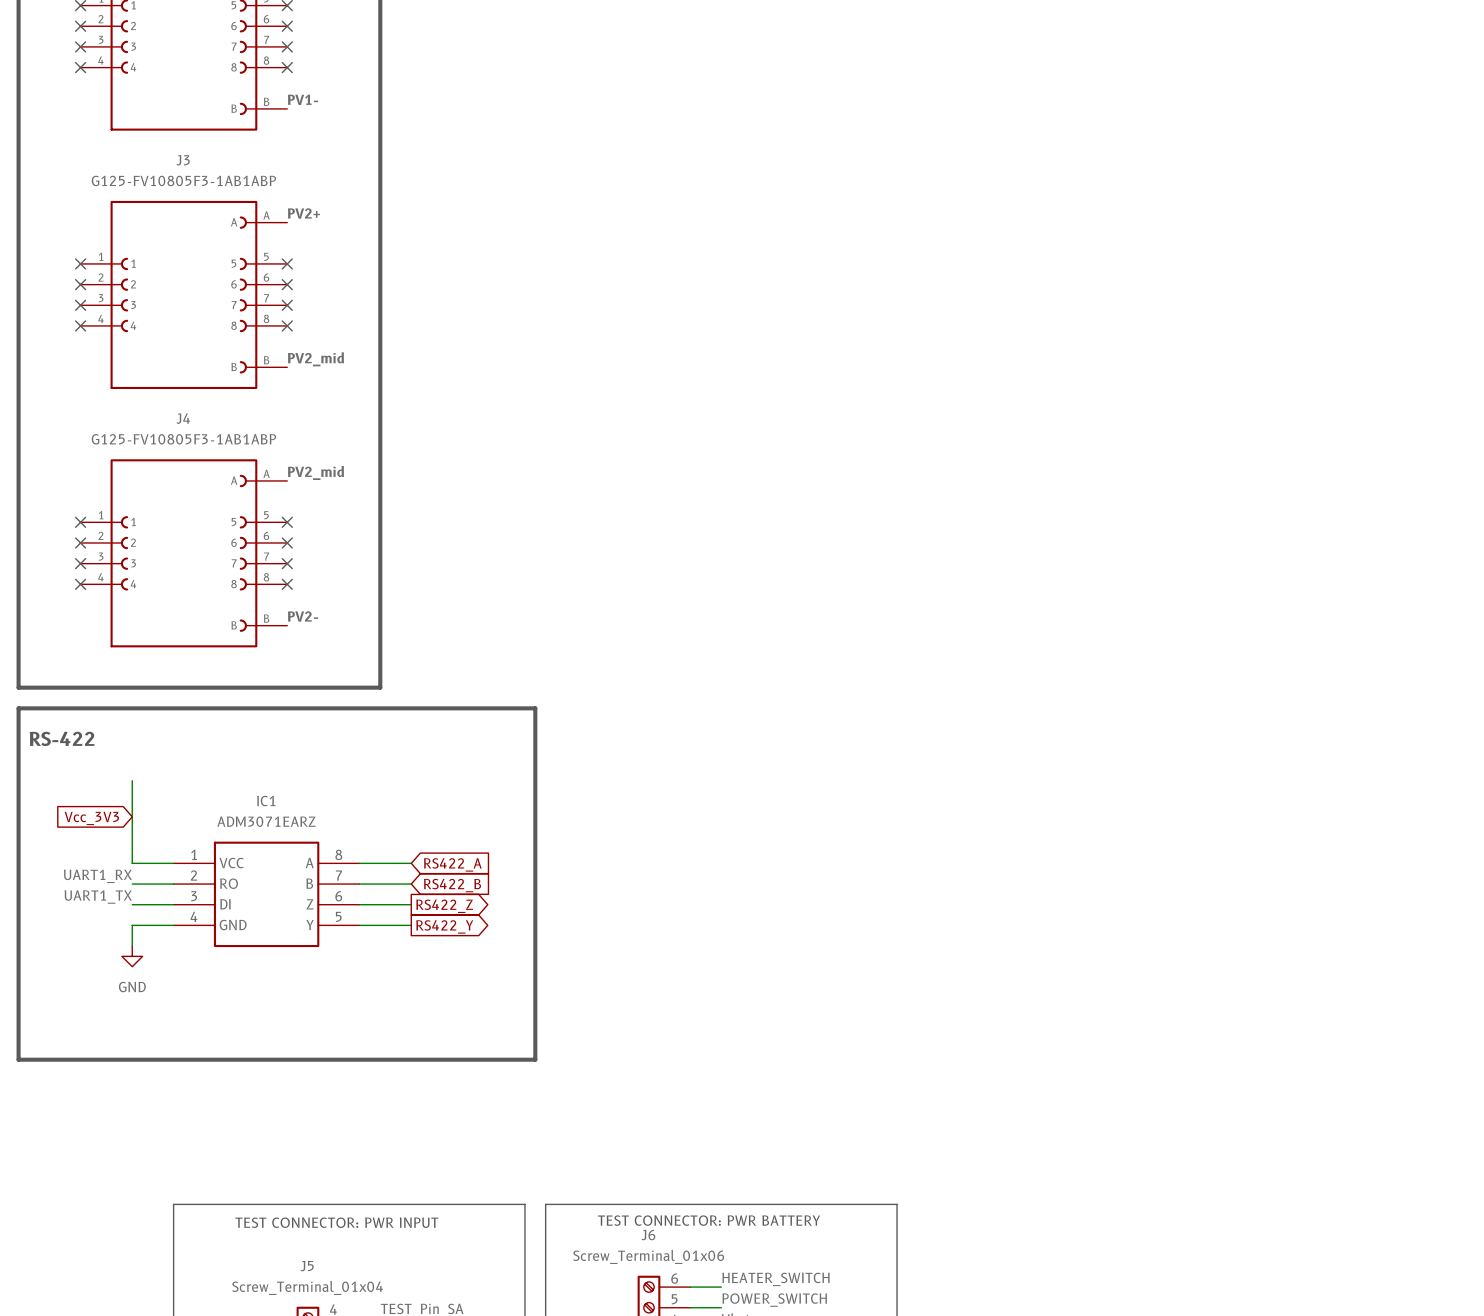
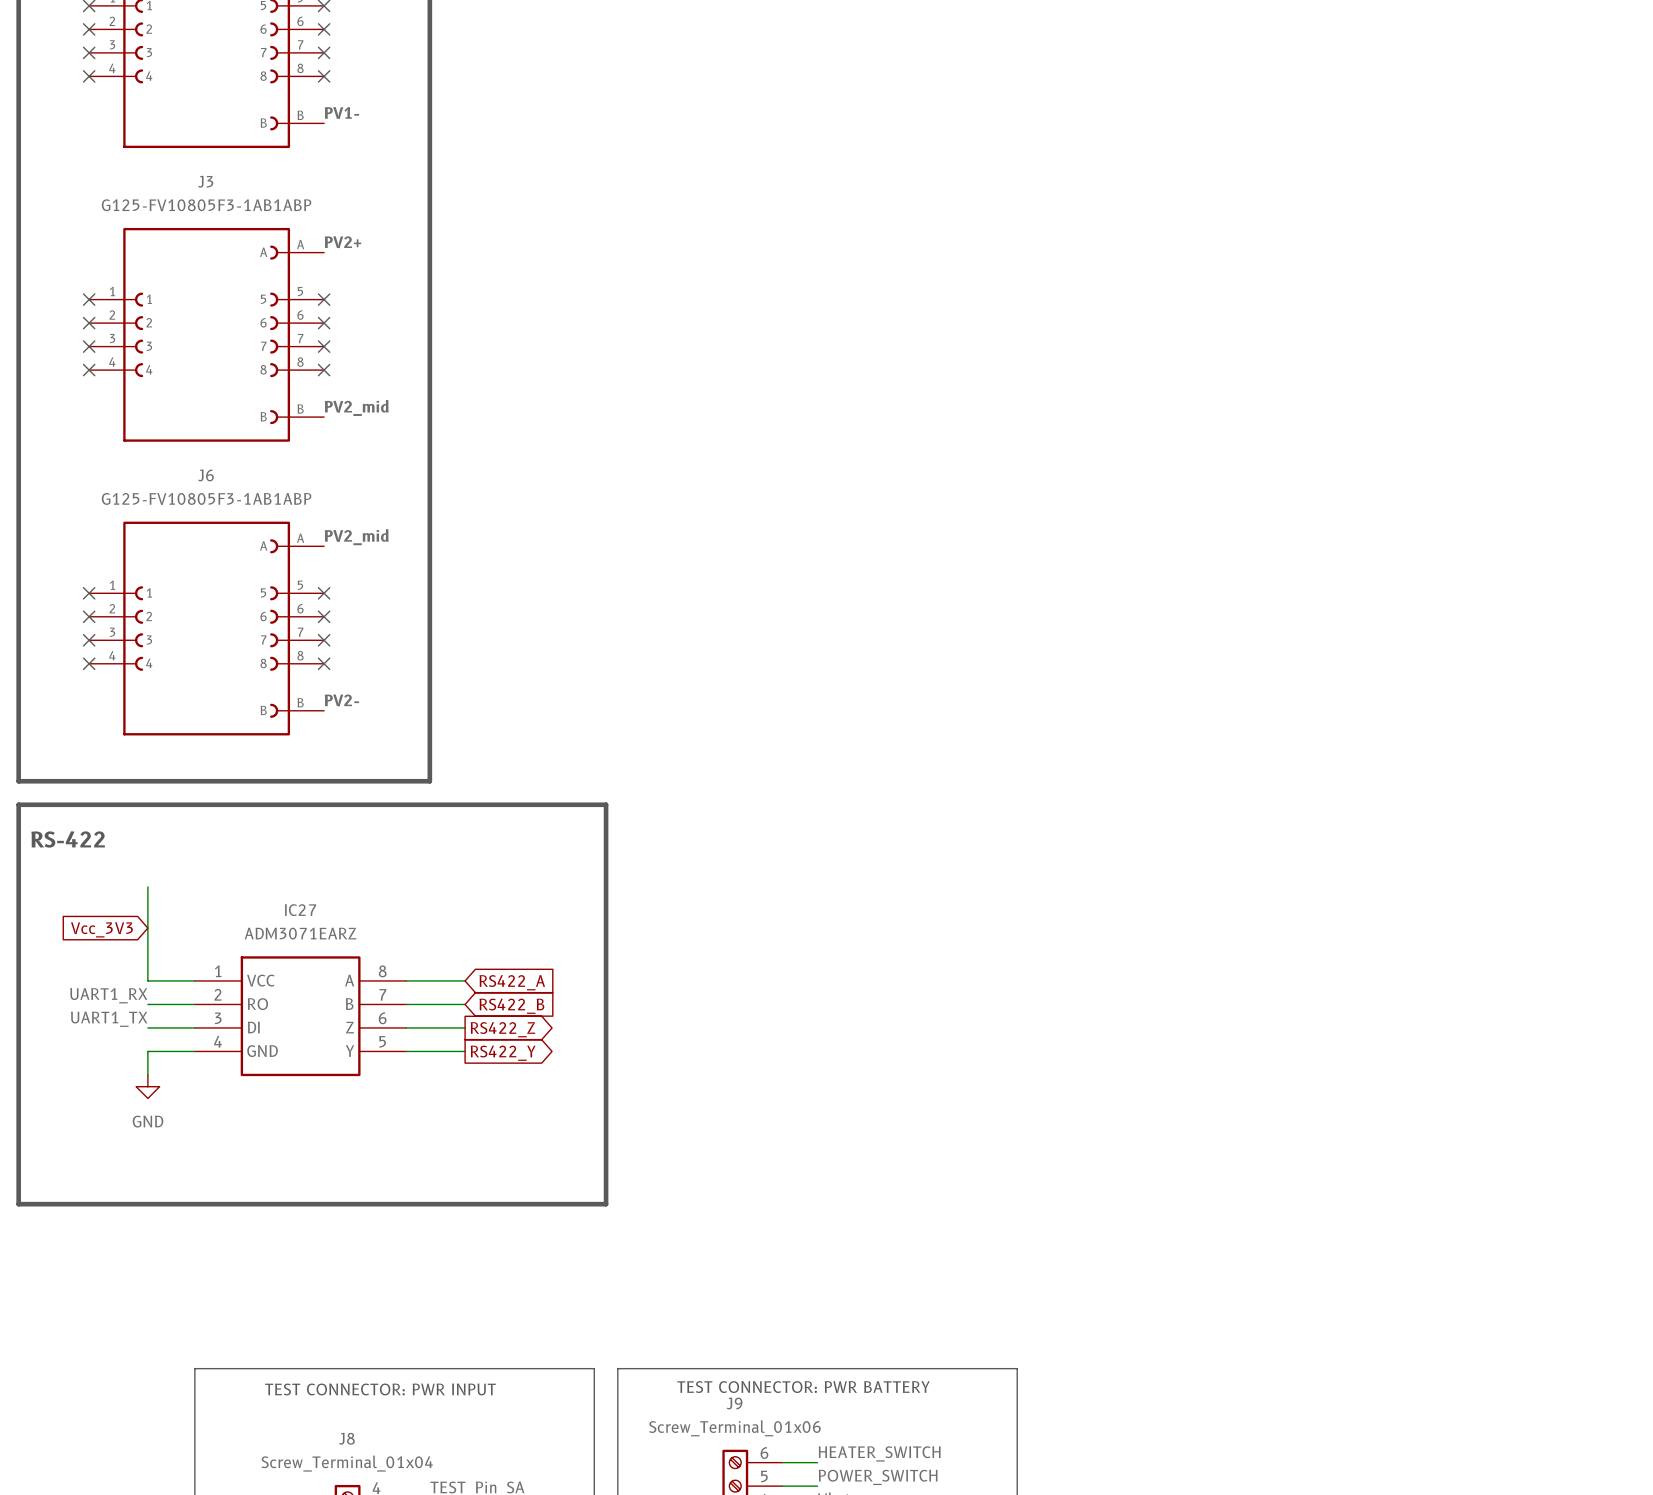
J4 name: J4 (183, 418) -> J6 (205, 475)
IC1 name: IC1 (266, 801) -> IC27 (300, 910)
J6 name: J6 (648, 1235) -> J9 (734, 1403)
J5 name: J5 (307, 1266) -> J8 (346, 1438)

